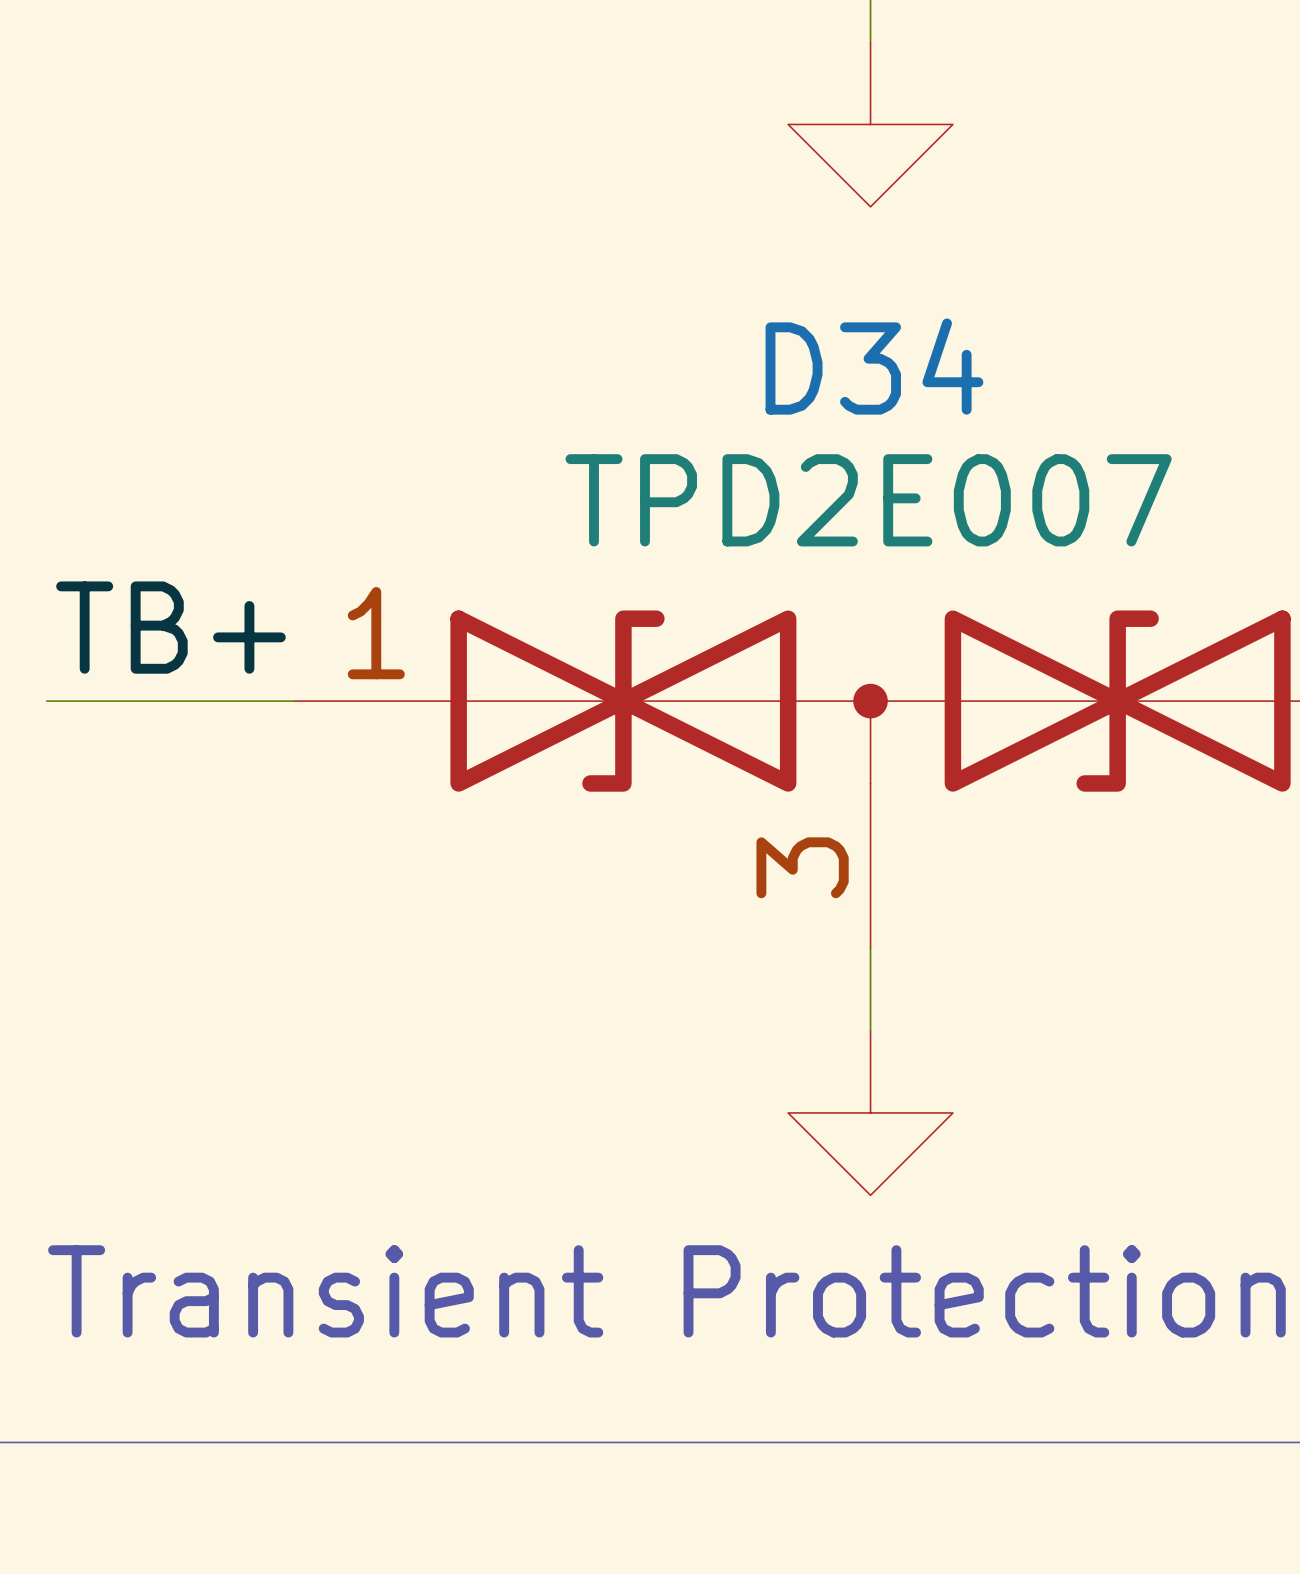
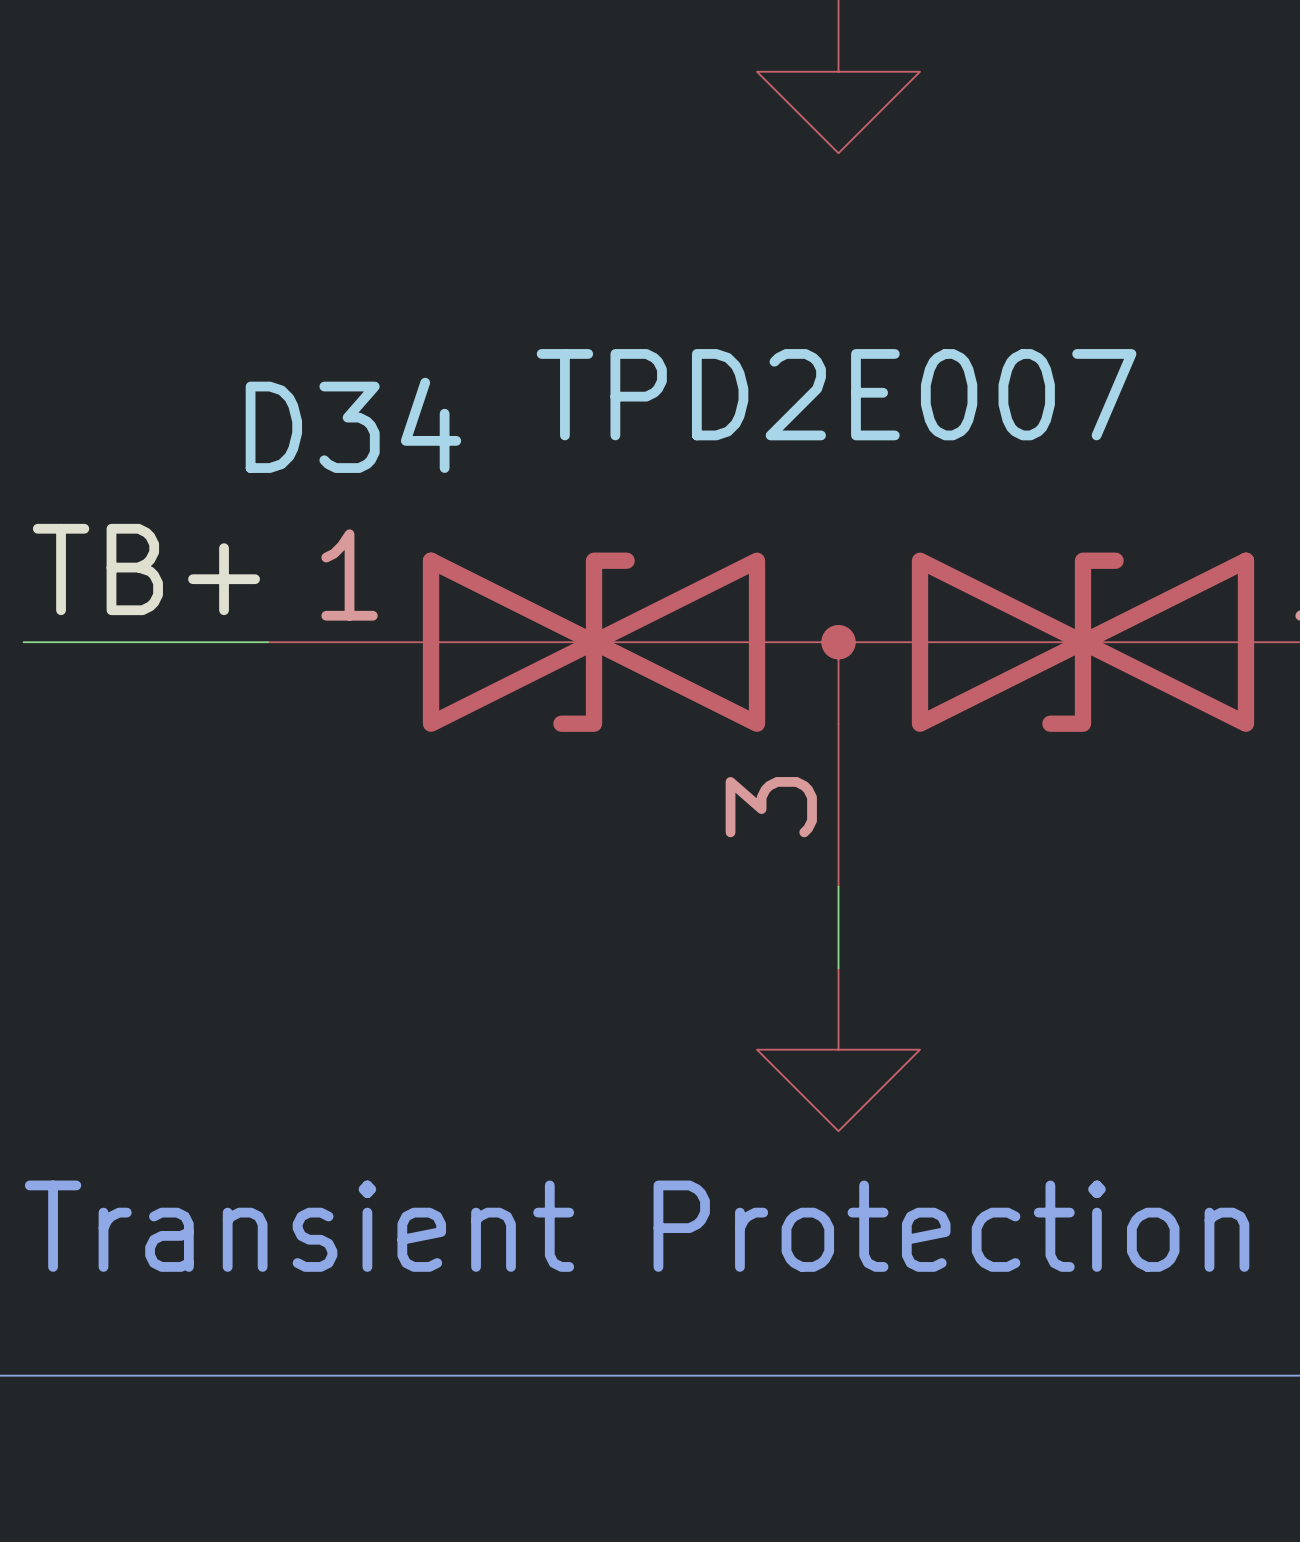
D34 name position: D34 (874, 366) -> D34 (353, 425)
D34 value position: TPD2E007 (868, 500) -> TPD2E007 (836, 394)

